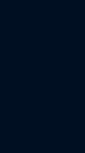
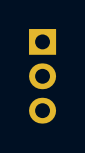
part: none -> (42, 76)

